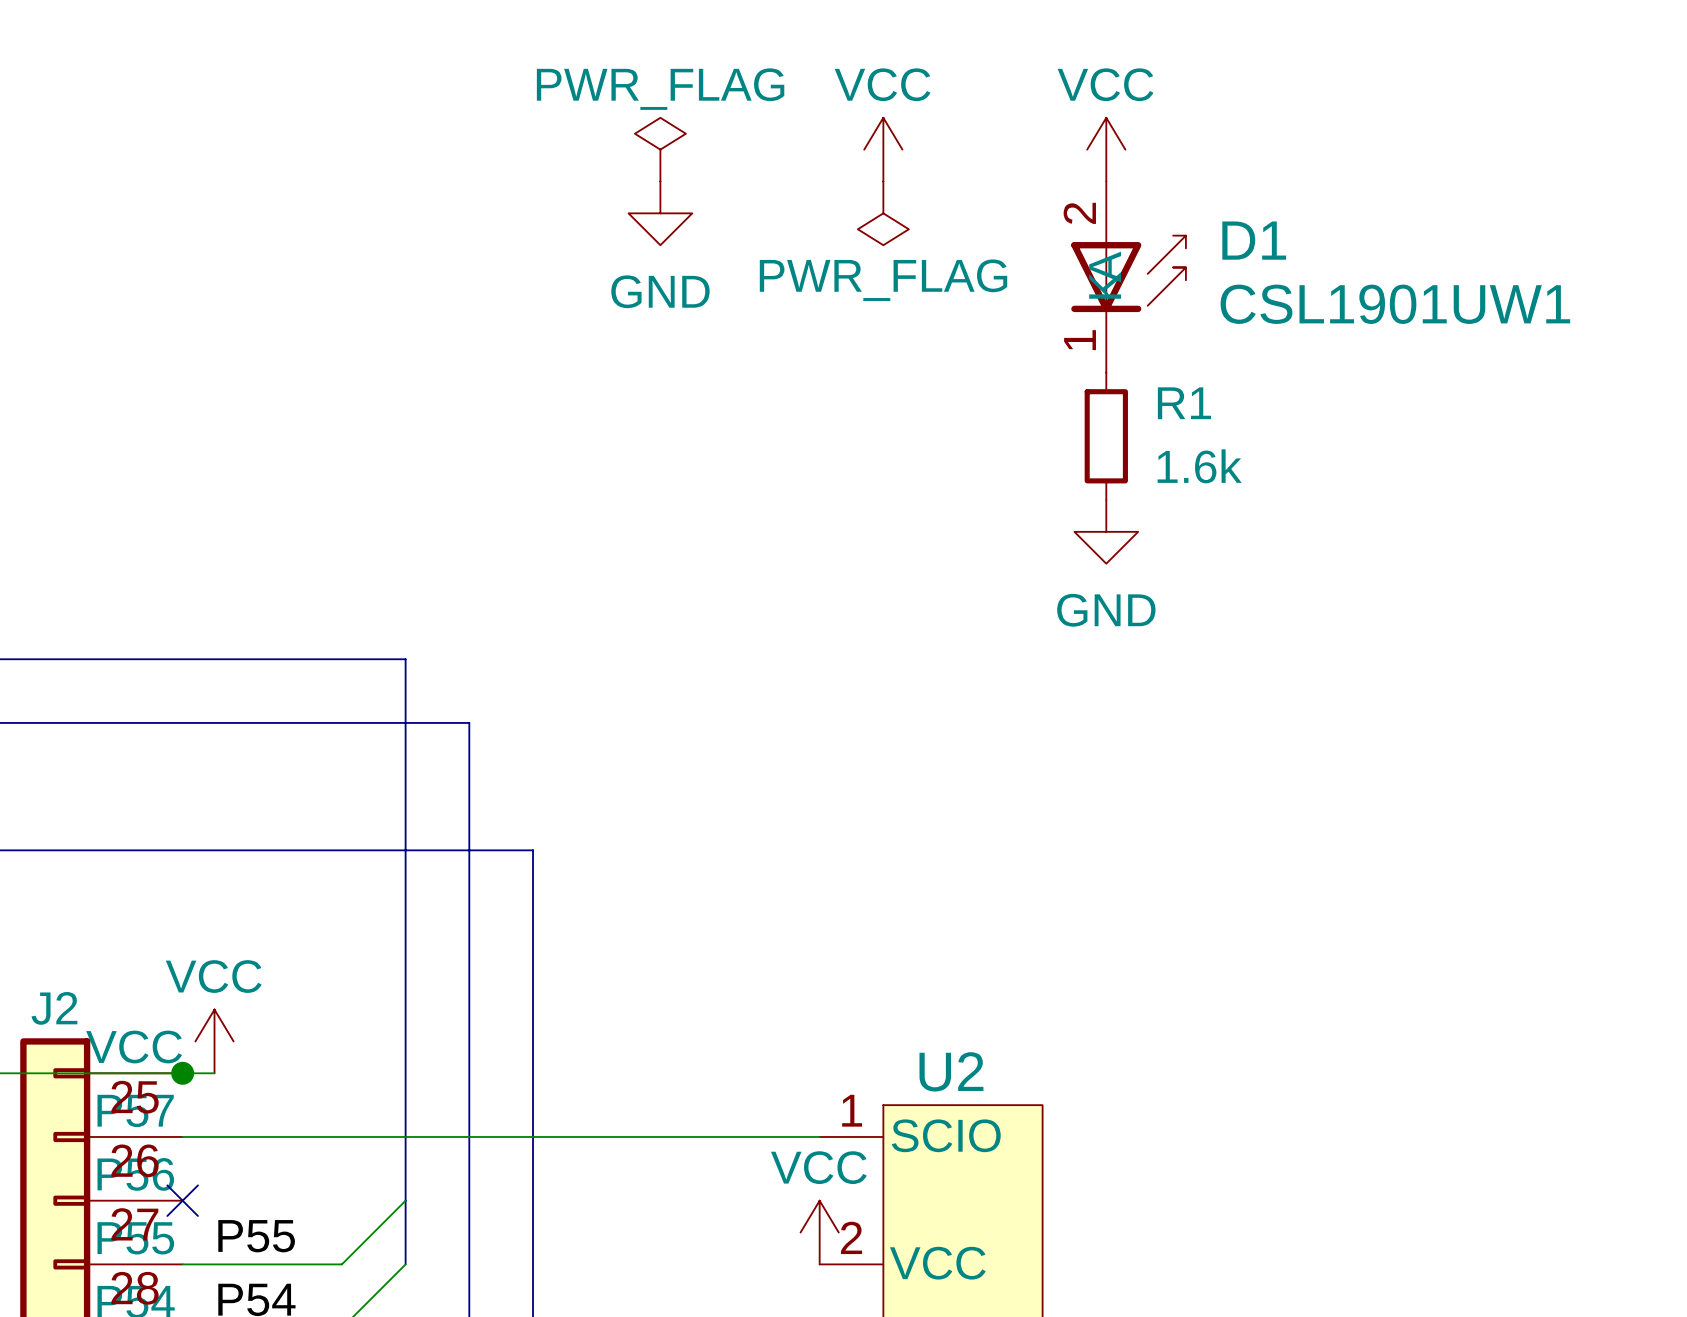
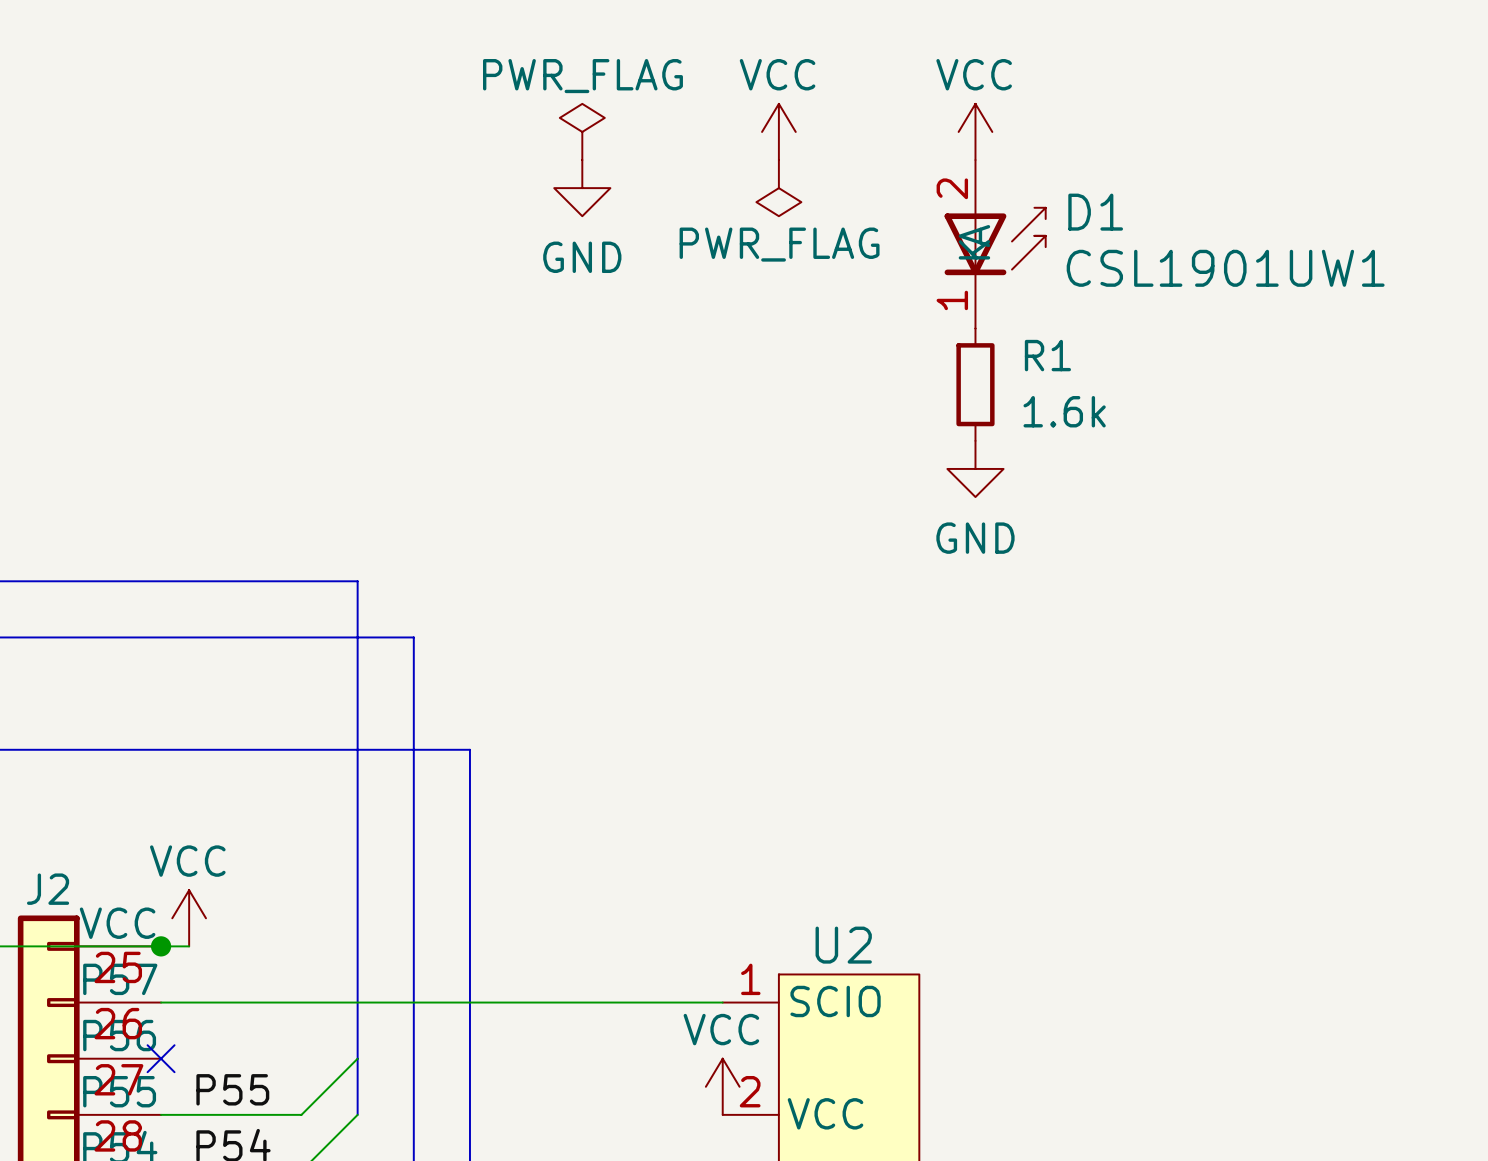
D1 name position: D1 (1254, 240) -> D1 (1095, 212)
D1 value position: CSL1901UW1 (1395, 304) -> CSL1901UW1 (1225, 268)

